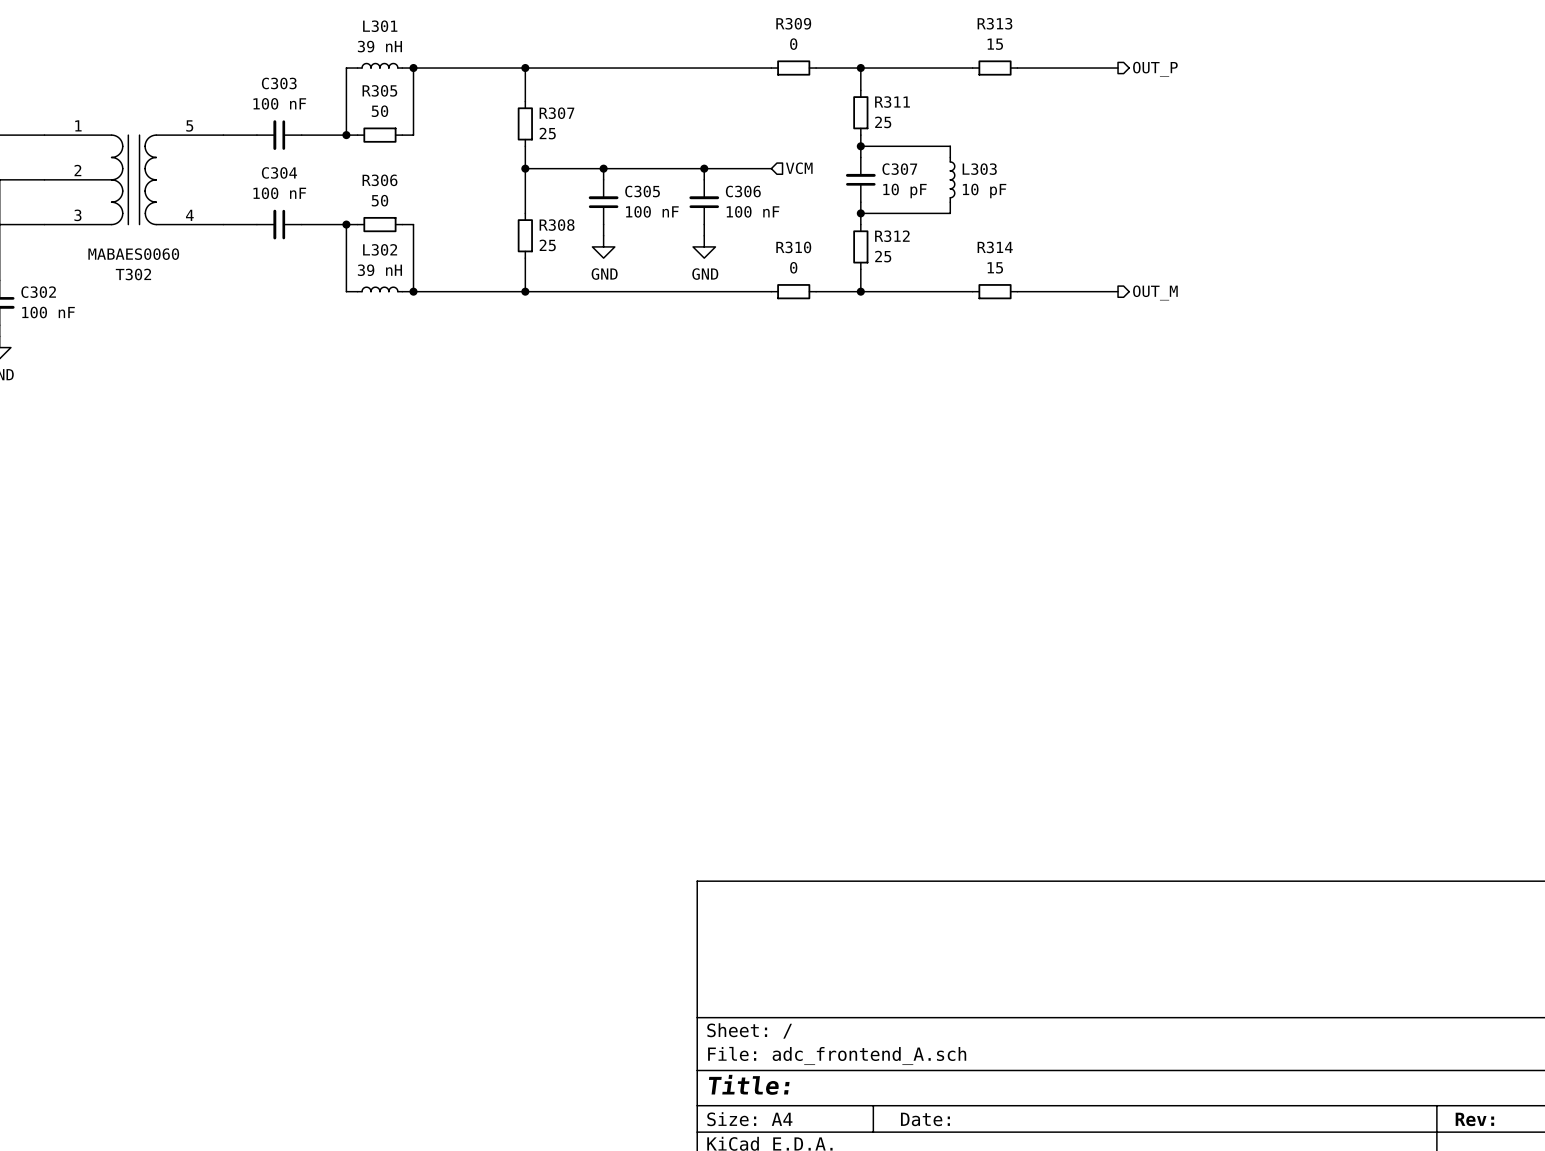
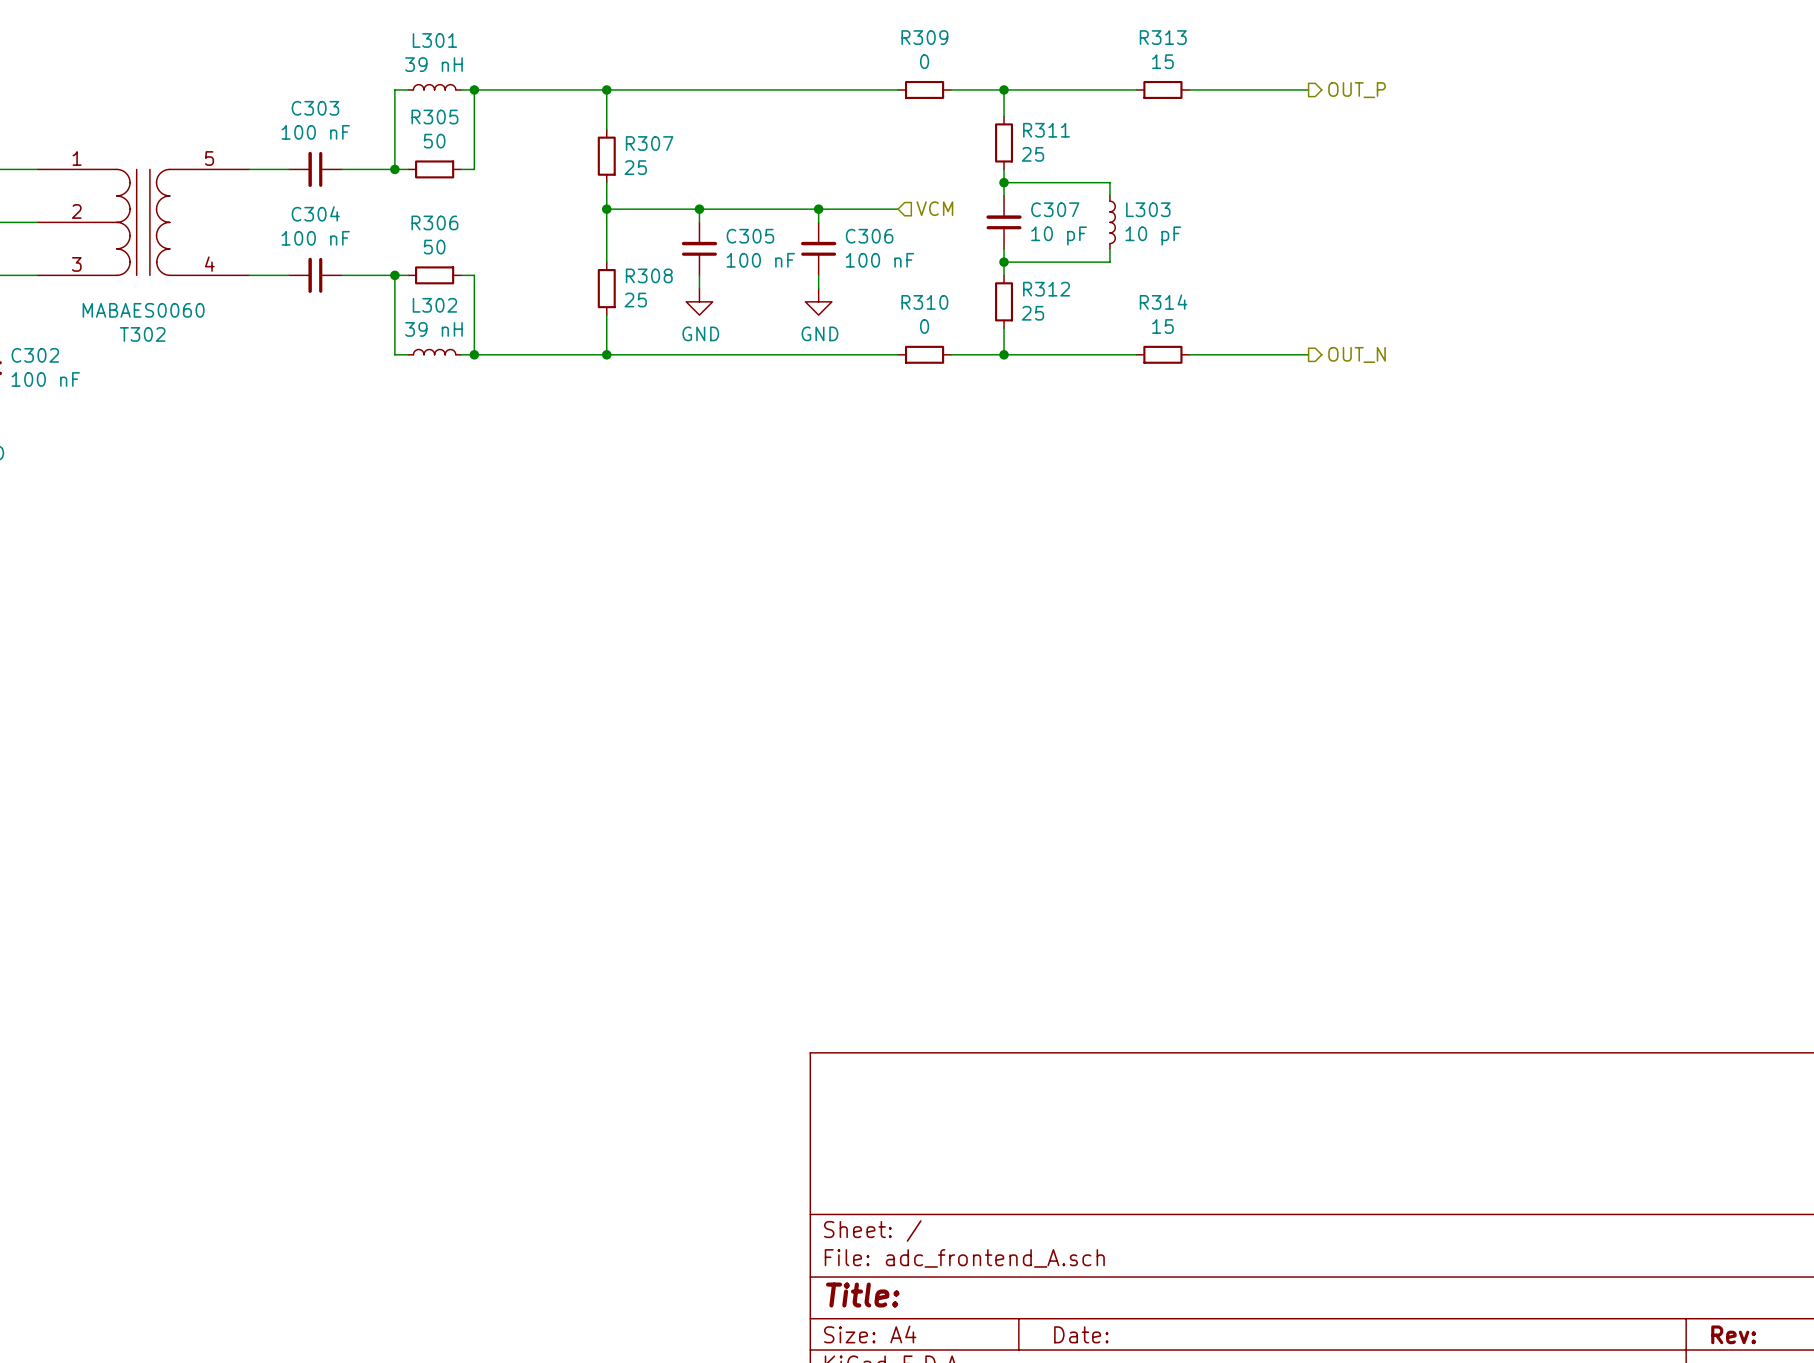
hierarchical label: OUT_M (1155, 292) -> OUT_N (1357, 354)

